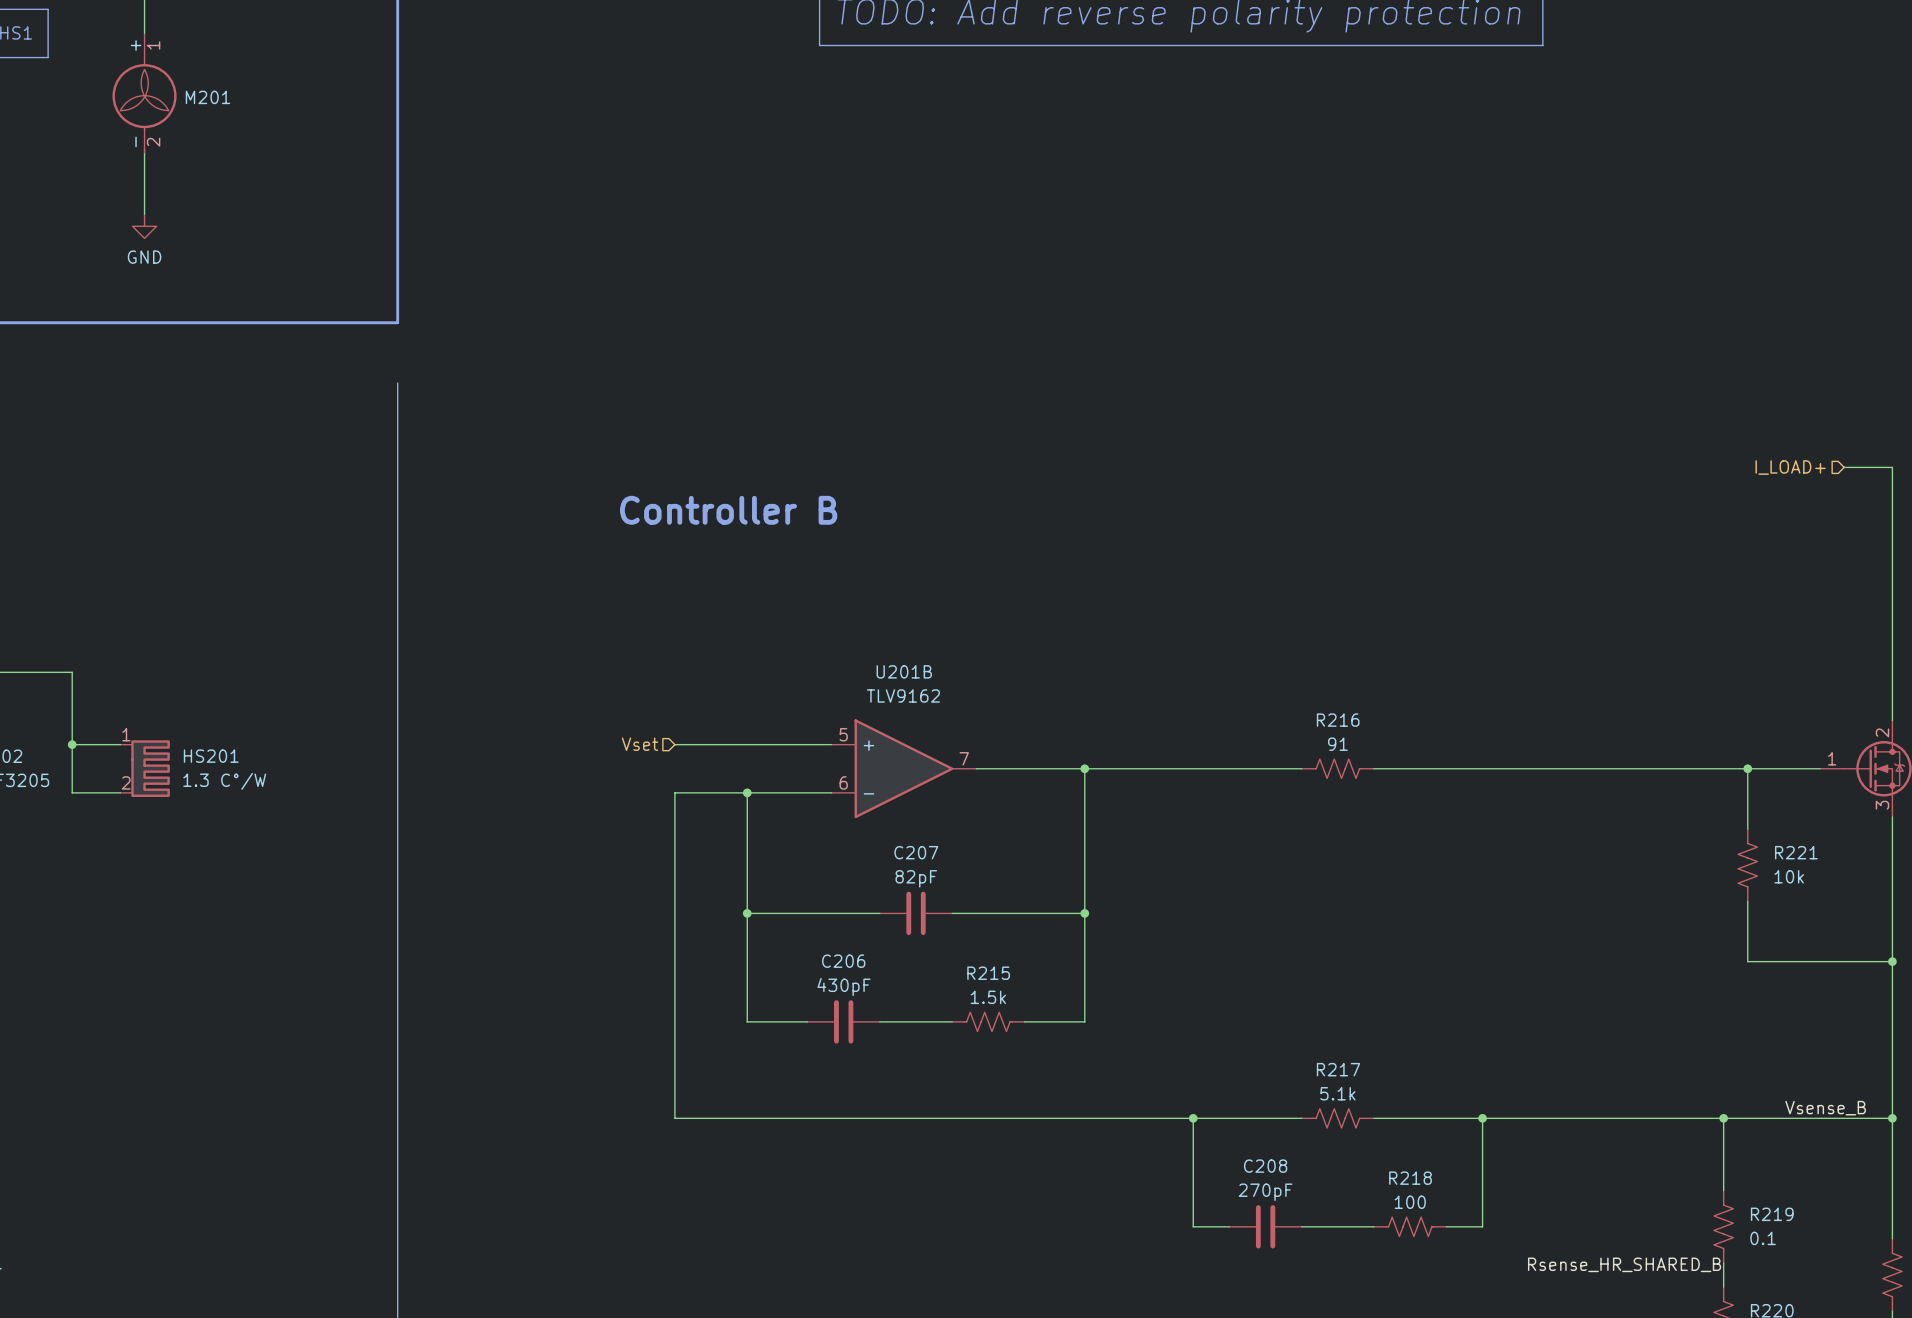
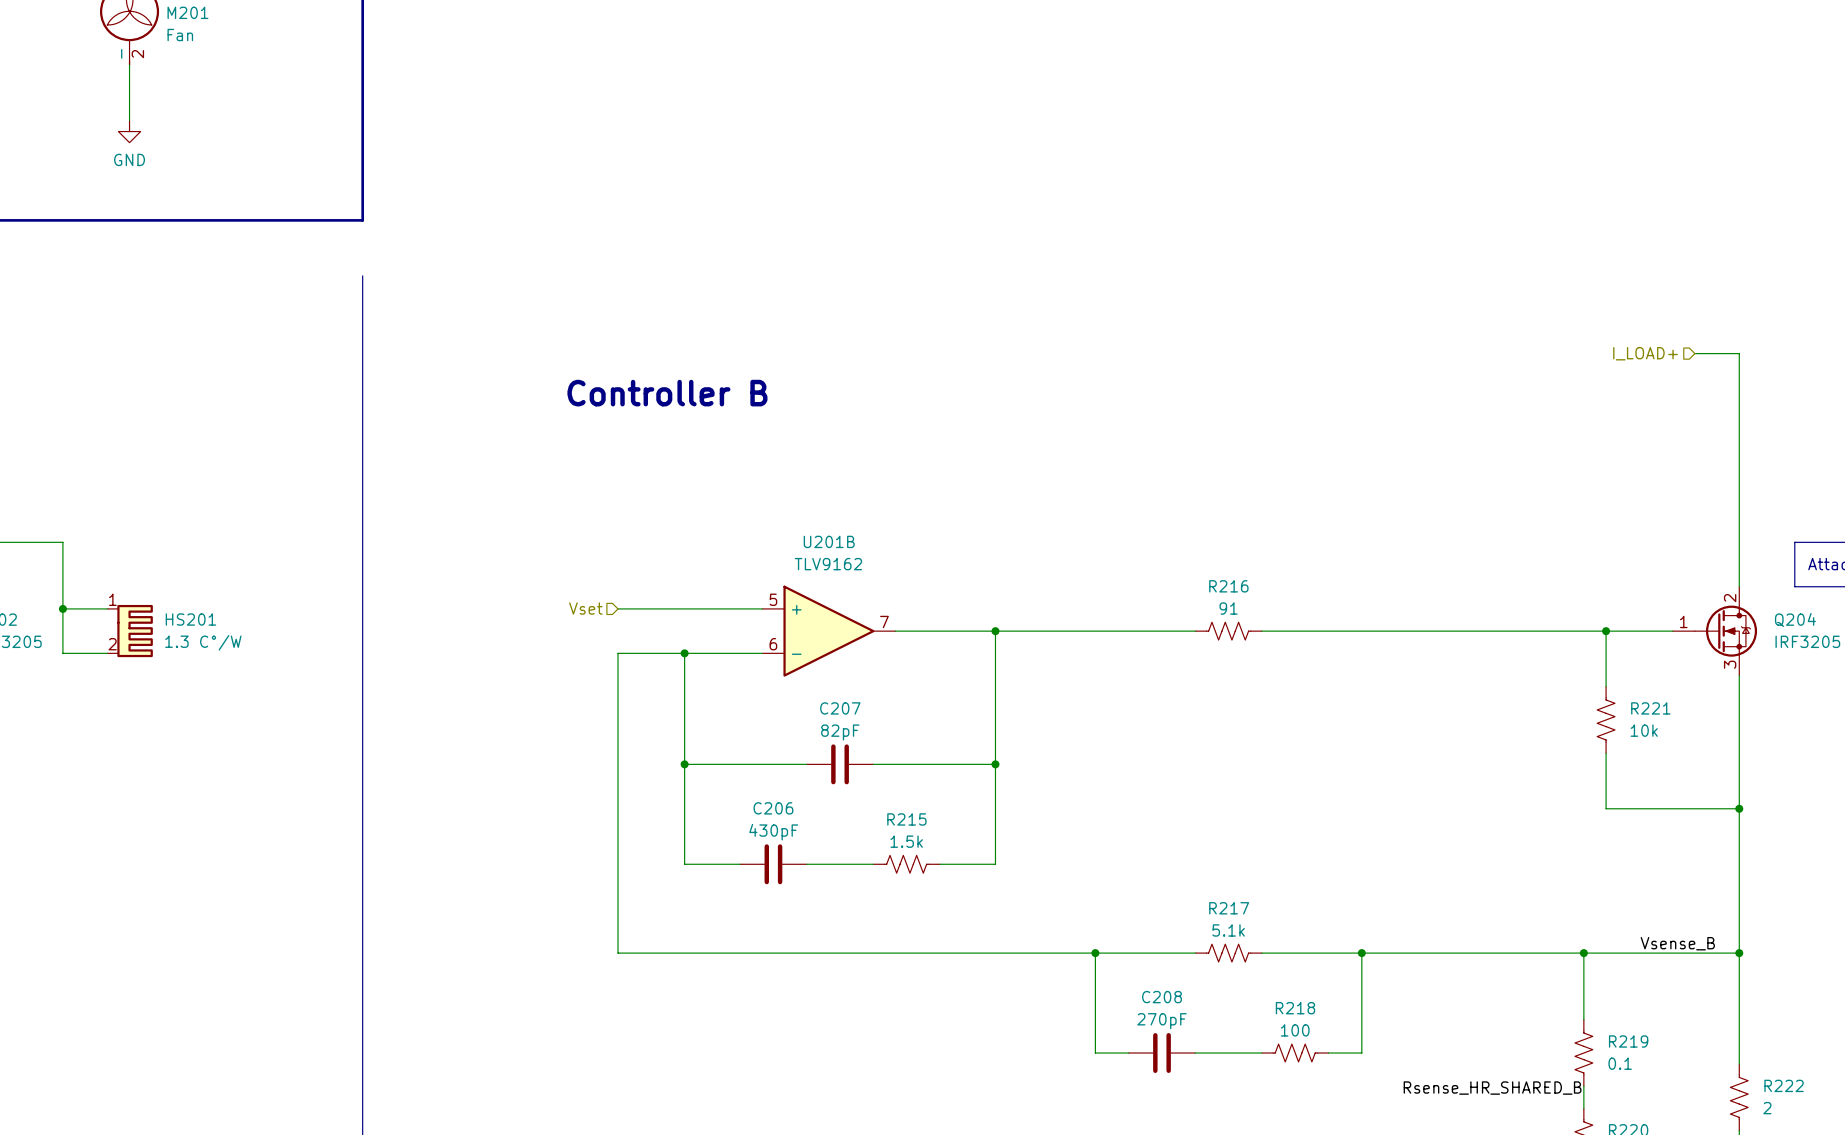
M201 value: none -> Fan (180, 35)

